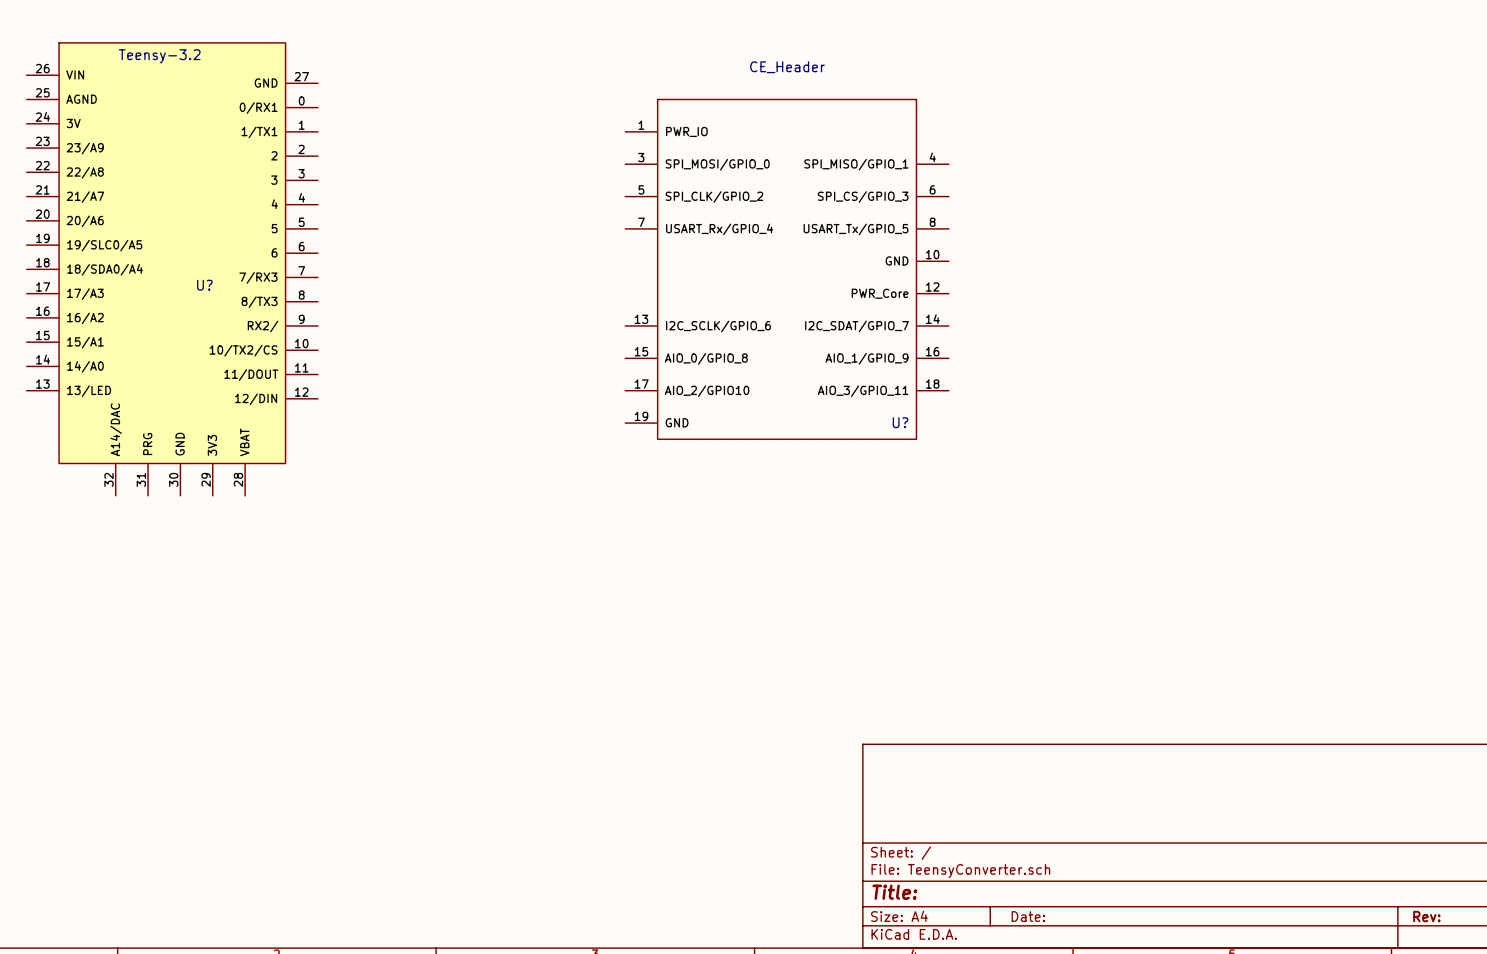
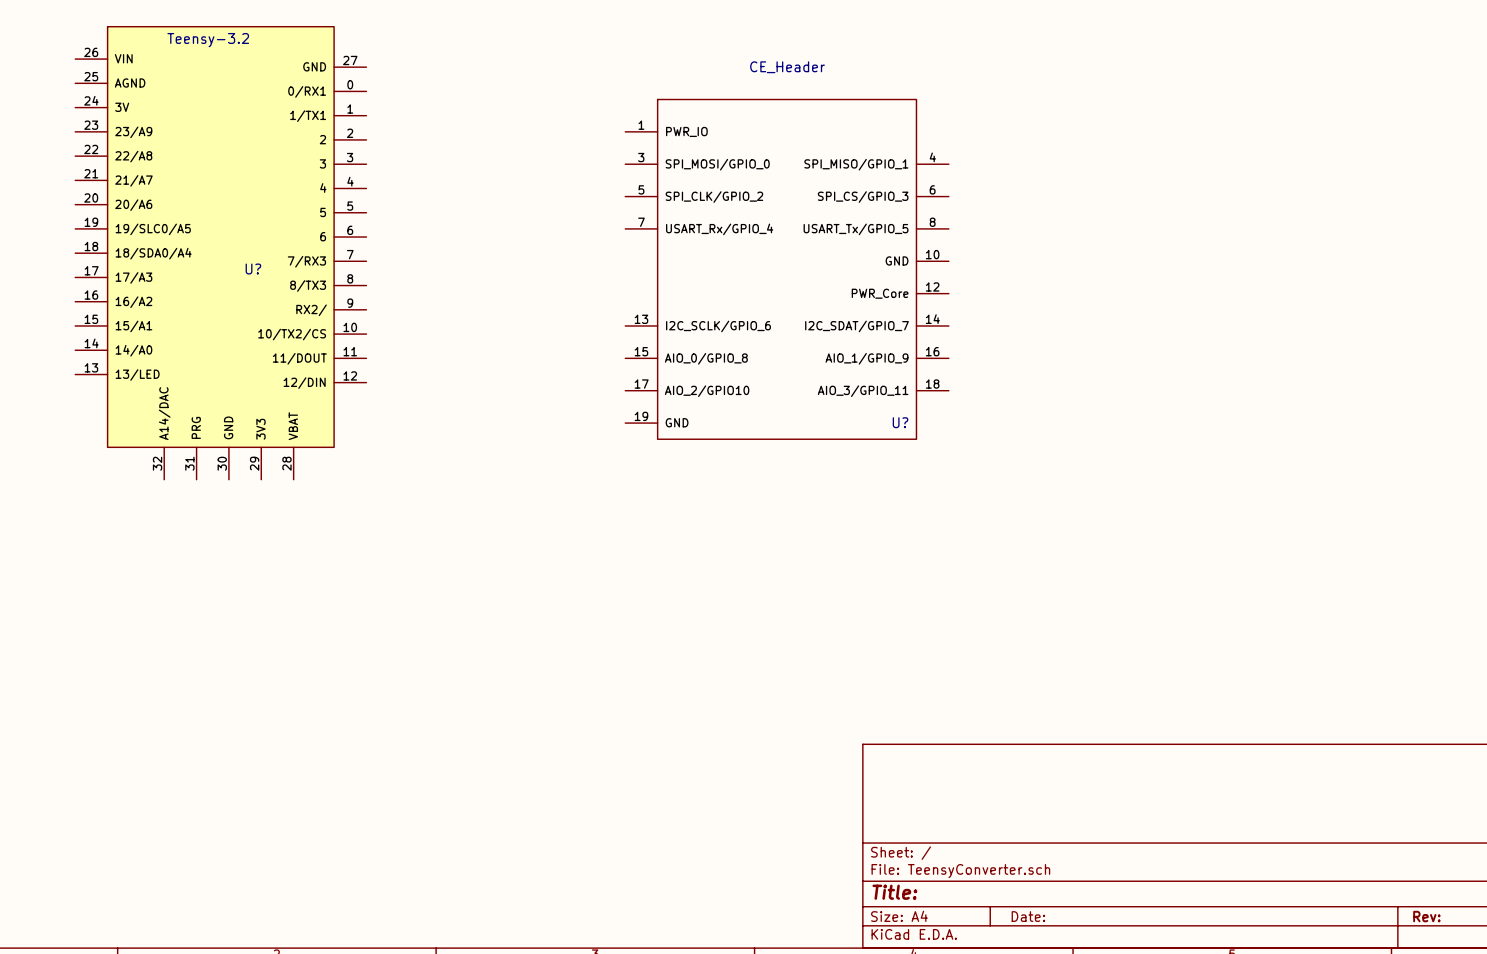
U? position: (172, 269) -> (220, 253)

